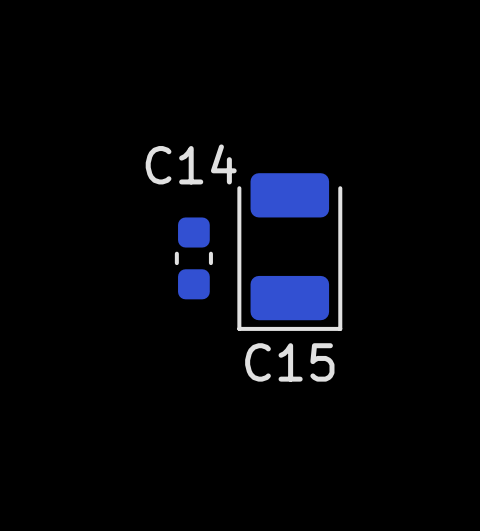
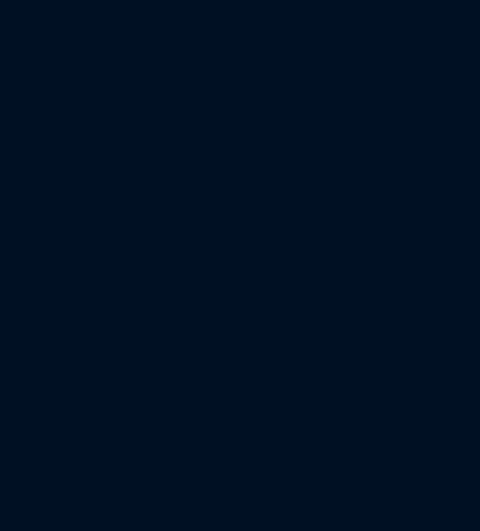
C15: (289, 252) -> none
C14: (193, 258) -> none

